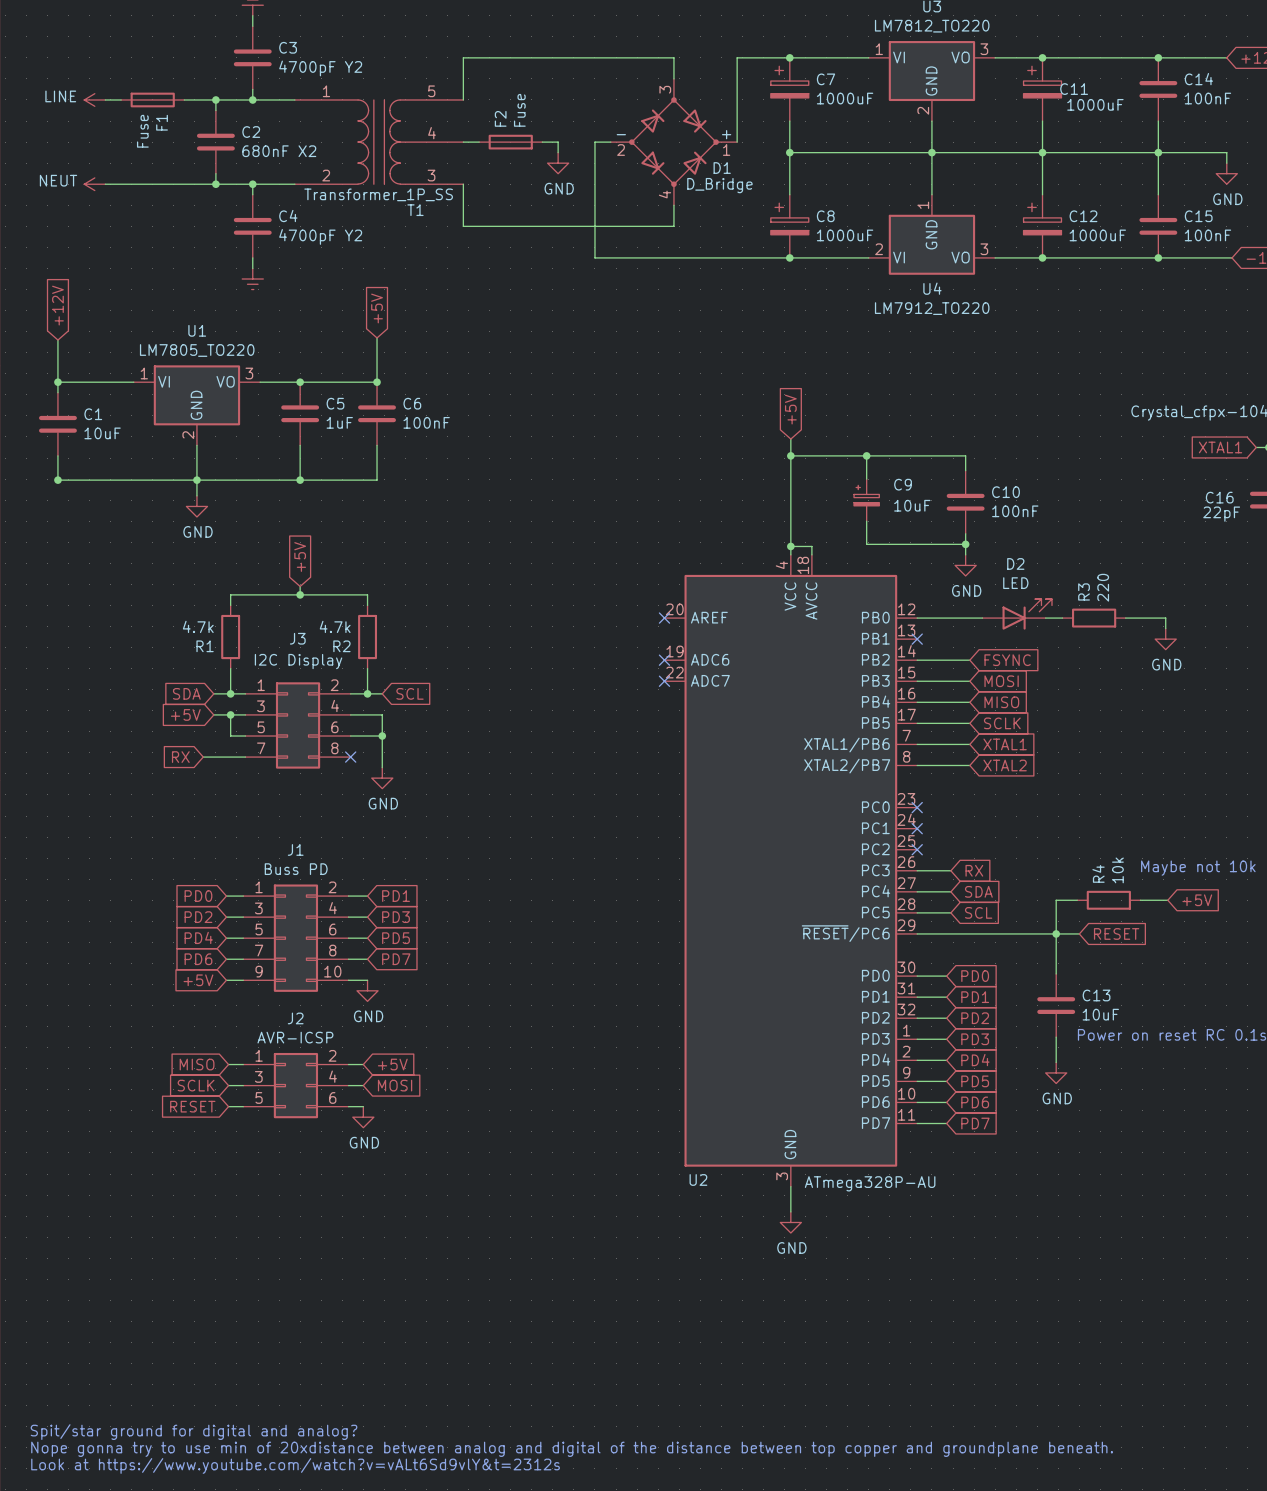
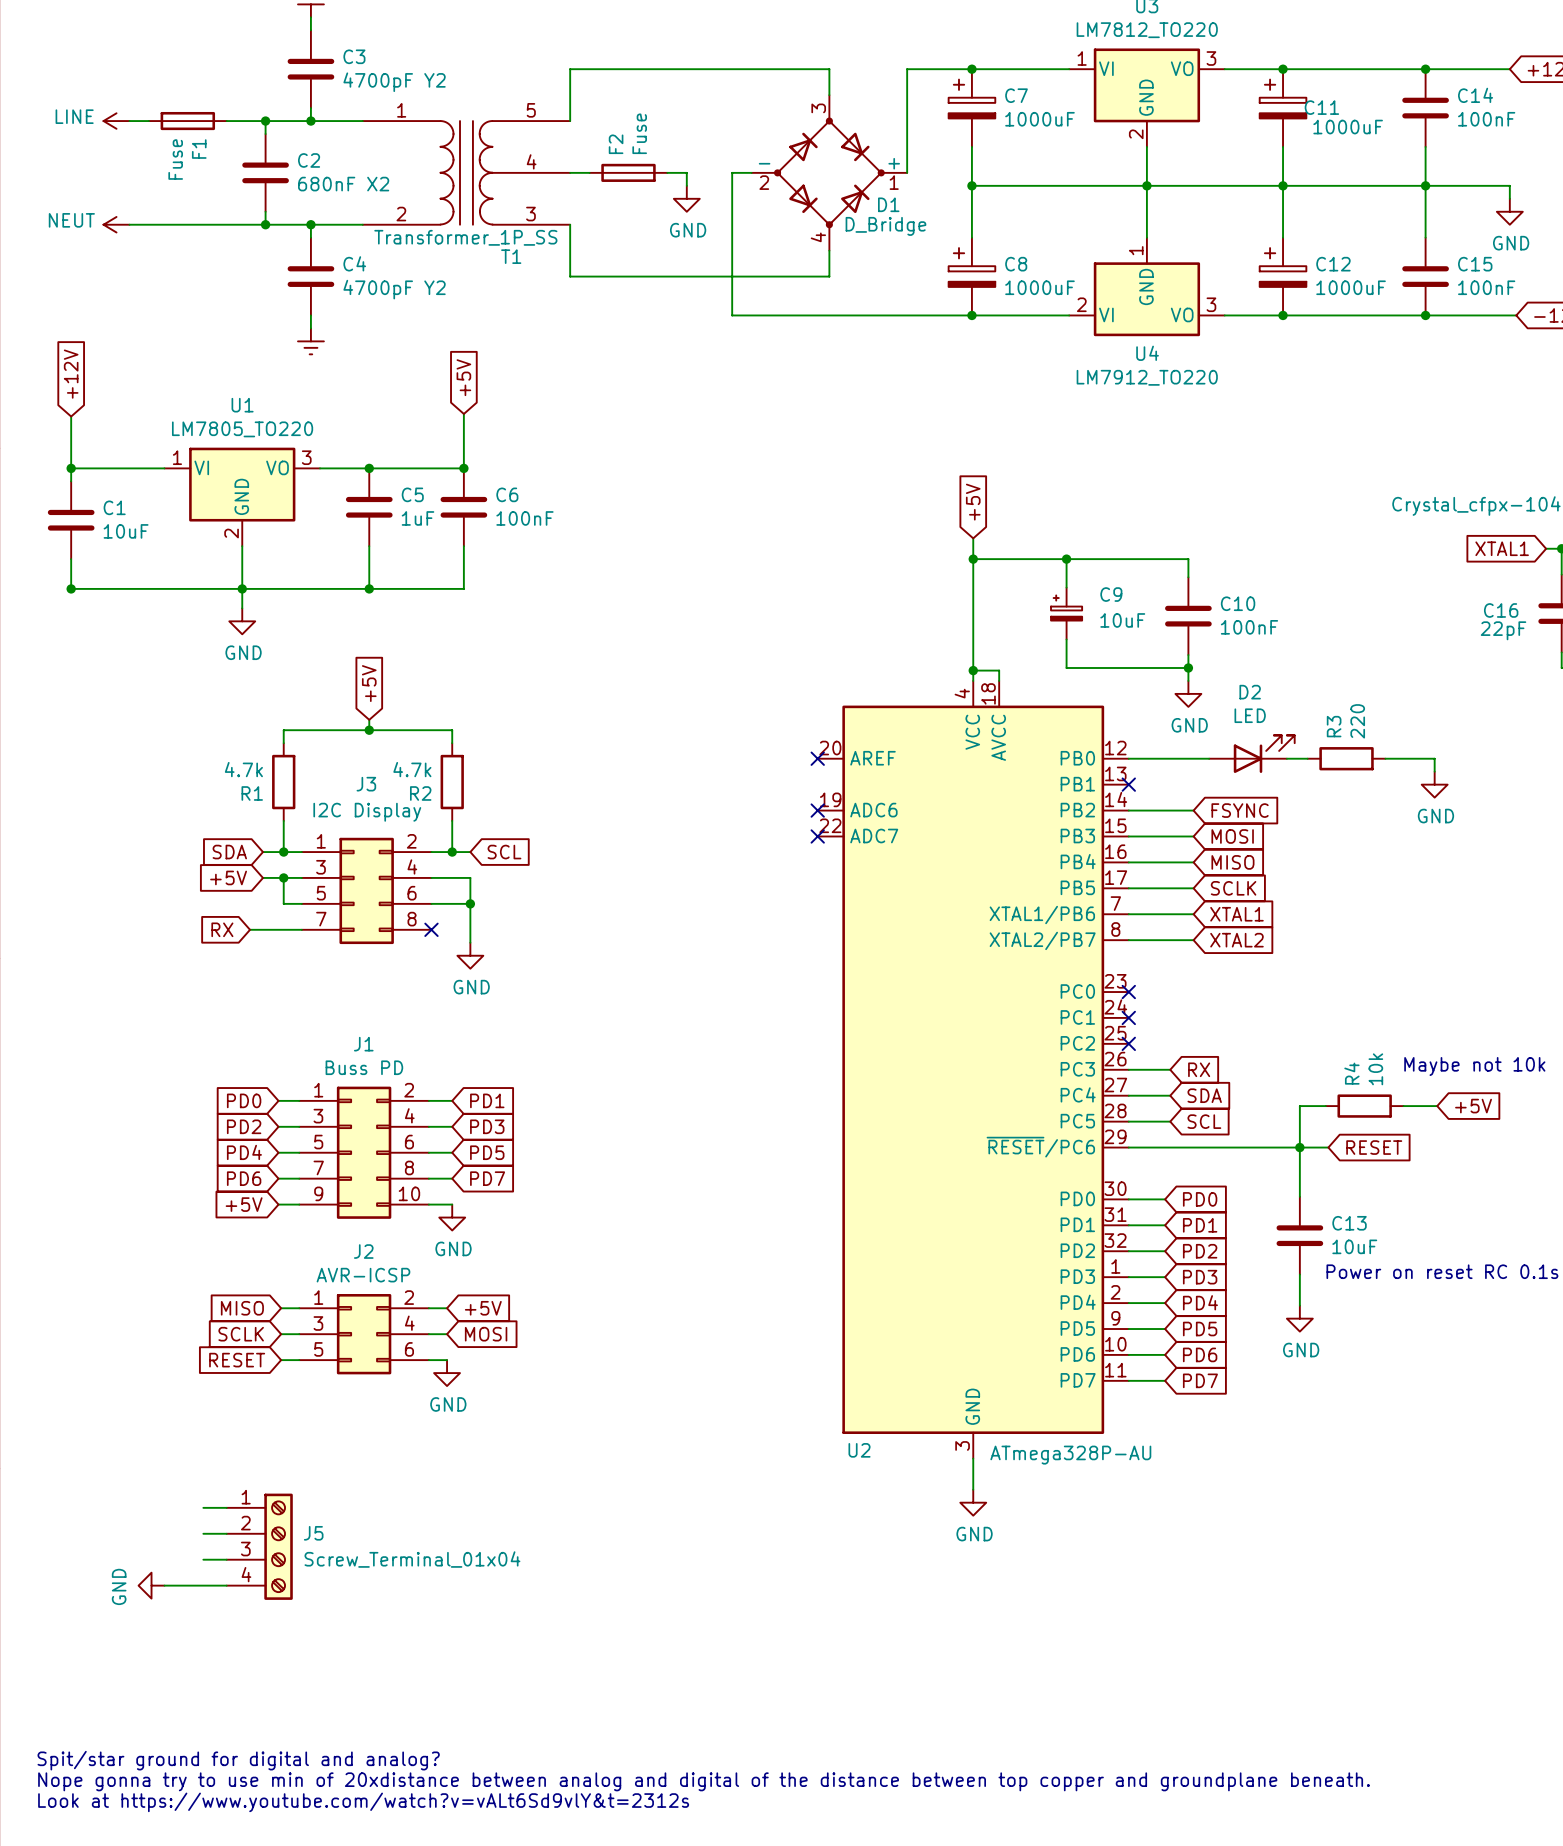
wire: none -> (203, 1507) (226, 1507)
wire: none -> (203, 1533) (226, 1533)
J5: none -> Screw_Terminal_01x04 (259, 1546)
wire: none -> (203, 1559) (226, 1559)
power symbol: none -> GND (151, 1585)
wire: none -> (164, 1585) (226, 1585)

